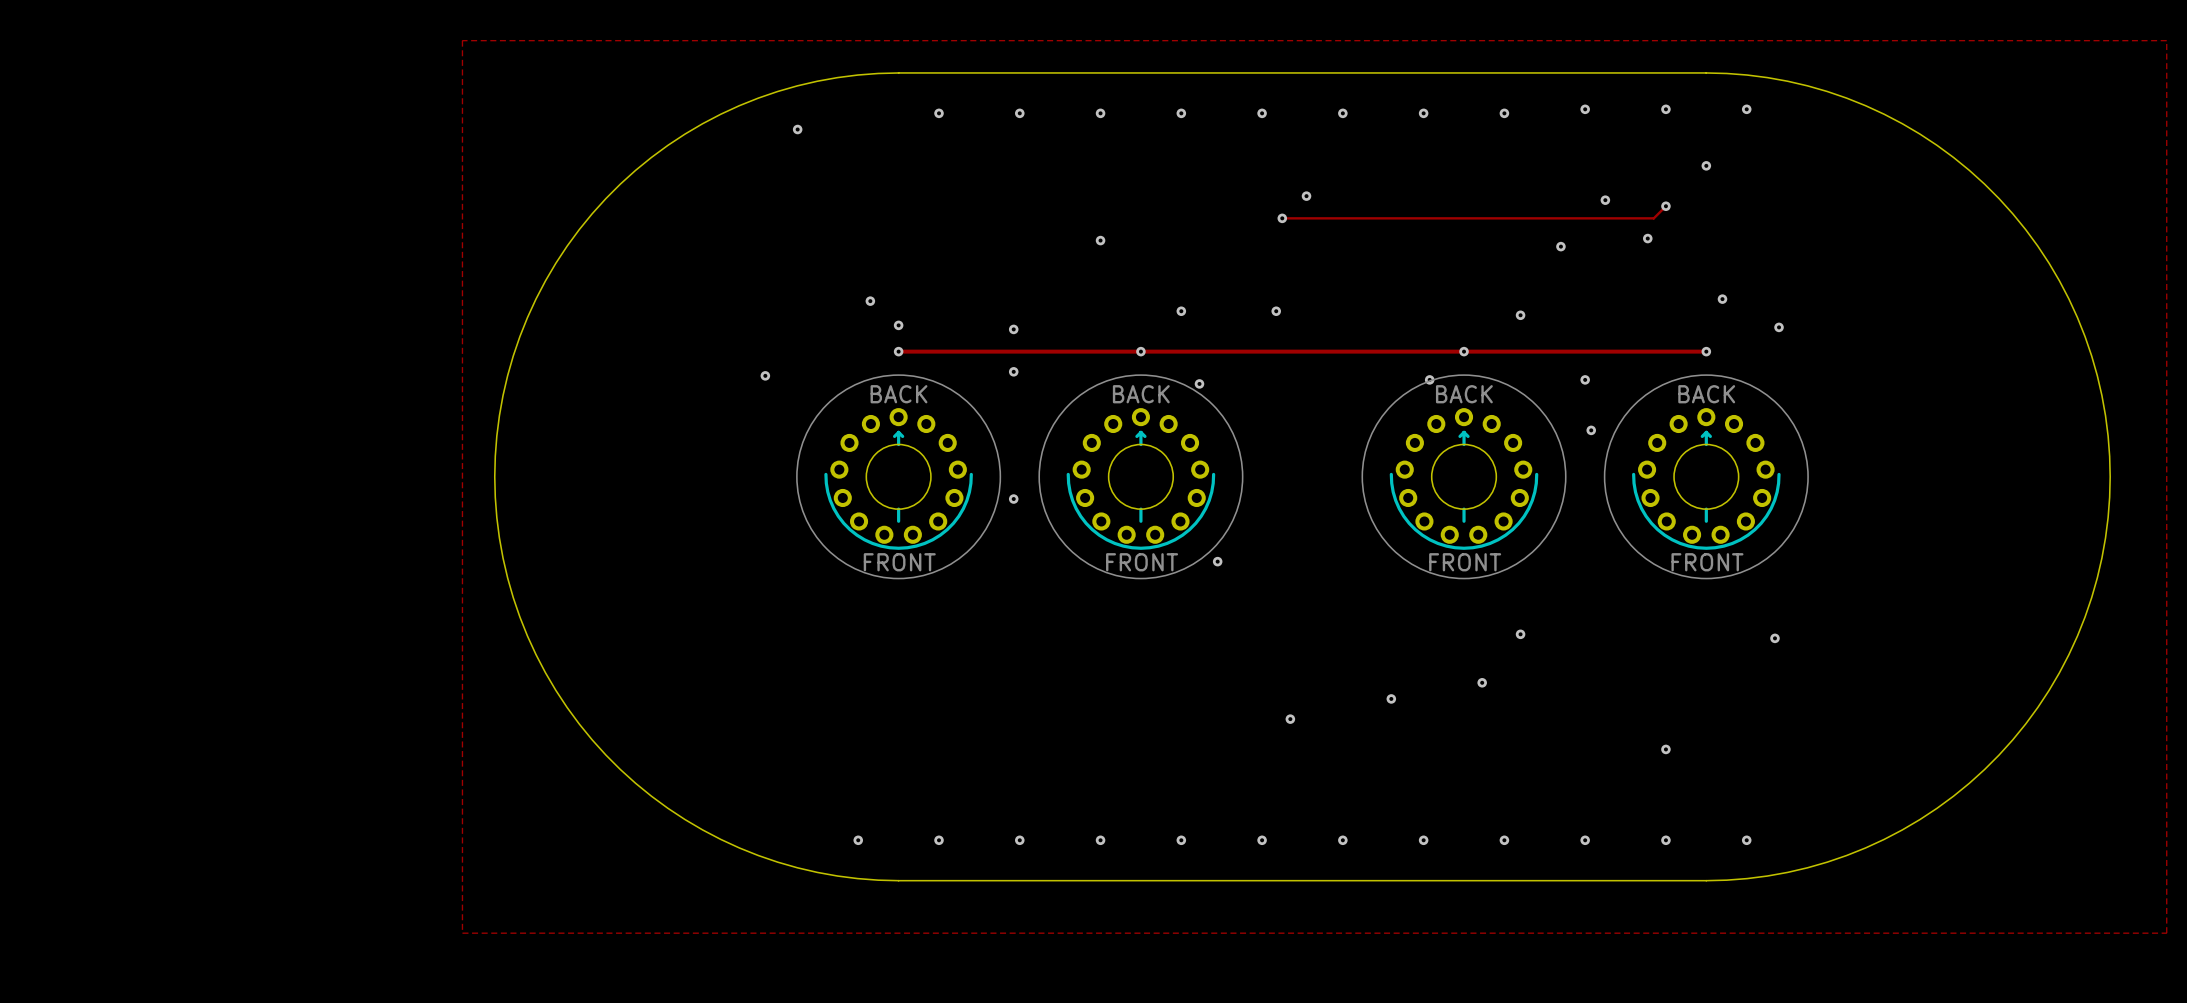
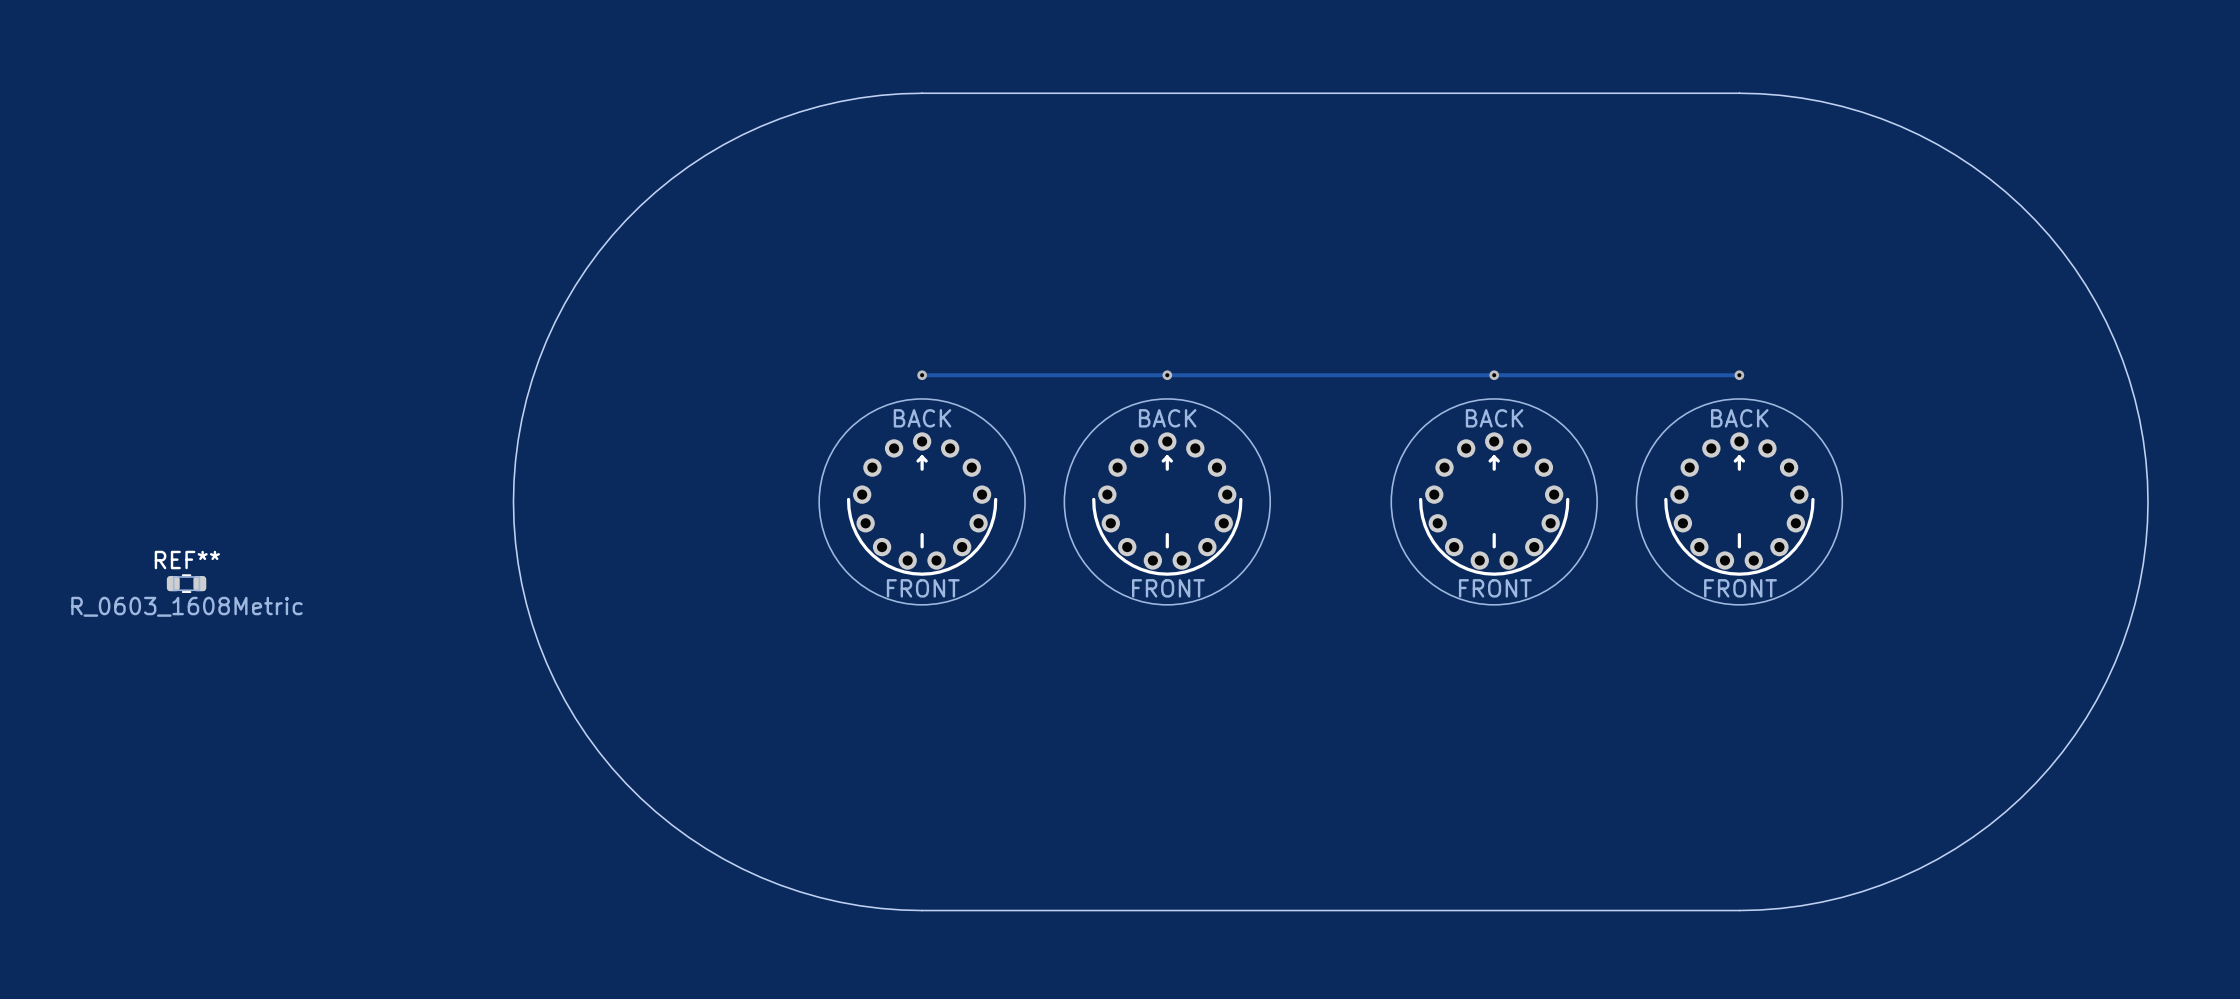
zone outline: (462, 40) (2166, 40) (2166, 933) (462, 933) (462, 40) -> none
via: (1585, 109) -> none
via: (1665, 109) -> none
via: (1746, 109) -> none
via: (939, 113) -> none
via: (1019, 113) -> none
via: (1100, 113) -> none
via: (1181, 113) -> none
via: (1262, 113) -> none
via: (1342, 113) -> none
via: (1423, 113) -> none
via: (1504, 113) -> none
via: (797, 129) -> none
via: (1706, 165) -> none
via: (1306, 196) -> none
via: (1605, 200) -> none
track: (1665, 206) (1653, 218) (1282, 218) -> none
via: (1665, 206) -> none
via: (1282, 218) -> none
via: (1647, 238) -> none
via: (1100, 240) -> none
via: (1560, 246) -> none
via: (1722, 299) -> none
via: (870, 301) -> none
via: (1181, 311) -> none
via: (1276, 311) -> none
via: (1520, 315) -> none
via: (898, 325) -> none
via: (1779, 327) -> none
via: (1013, 329) -> none
via: (1013, 371) -> none
via: (765, 375) -> none
via: (1429, 379) -> none
via: (1585, 379) -> none
via: (1199, 383) -> none
via: (1591, 430) -> none
round board edge: [865, 443, 932, 510] -> none
round board edge: [1107, 443, 1175, 510] -> none
round board edge: [1430, 443, 1498, 510] -> none
round board edge: [1673, 443, 1740, 510] -> none
via: (1013, 499) -> none
REF**: none -> R_0603_1608Metric (186, 583)
via: (1217, 561) -> none
via: (1520, 634) -> none
via: (1774, 638) -> none
via: (1482, 682) -> none
via: (1391, 698) -> none
via: (1290, 719) -> none
via: (1665, 749) -> none
via: (858, 840) -> none
via: (939, 840) -> none
via: (1019, 840) -> none
via: (1100, 840) -> none
via: (1181, 840) -> none
via: (1262, 840) -> none
via: (1342, 840) -> none
via: (1423, 840) -> none
via: (1504, 840) -> none
via: (1585, 840) -> none
via: (1665, 840) -> none
via: (1746, 840) -> none

